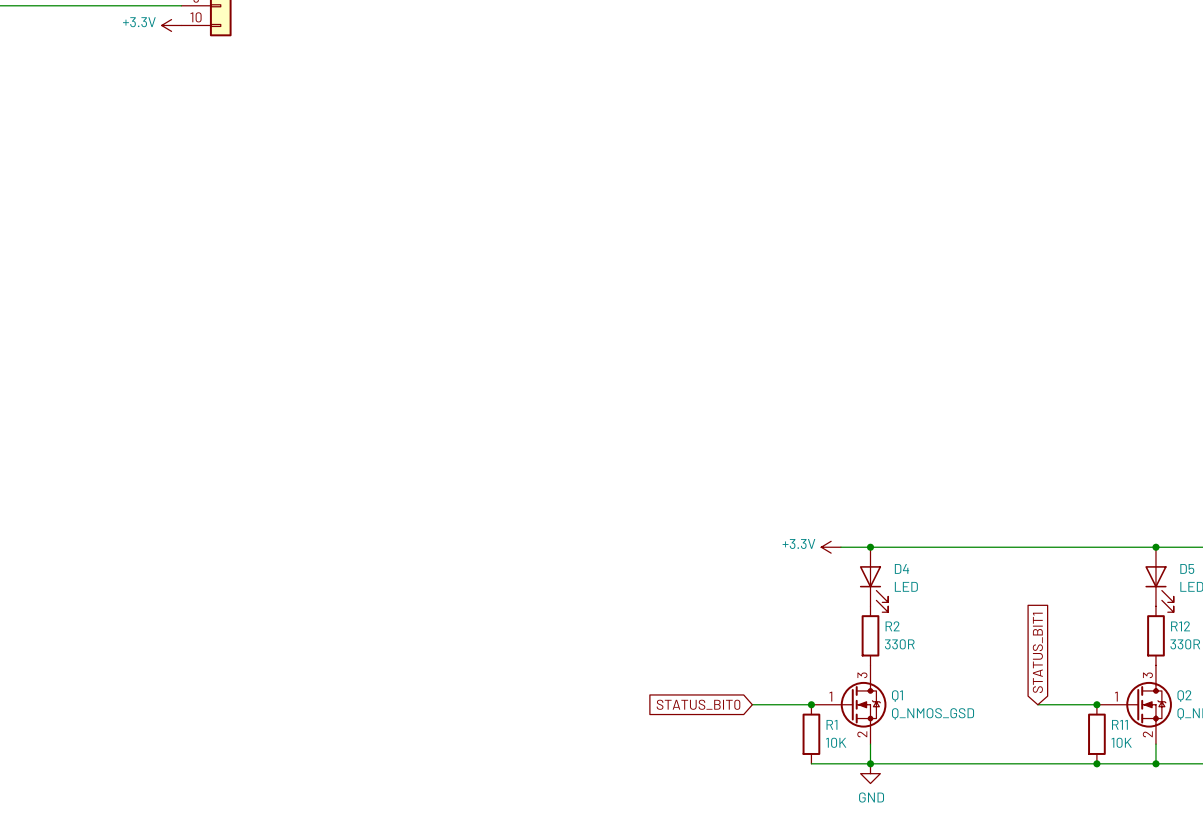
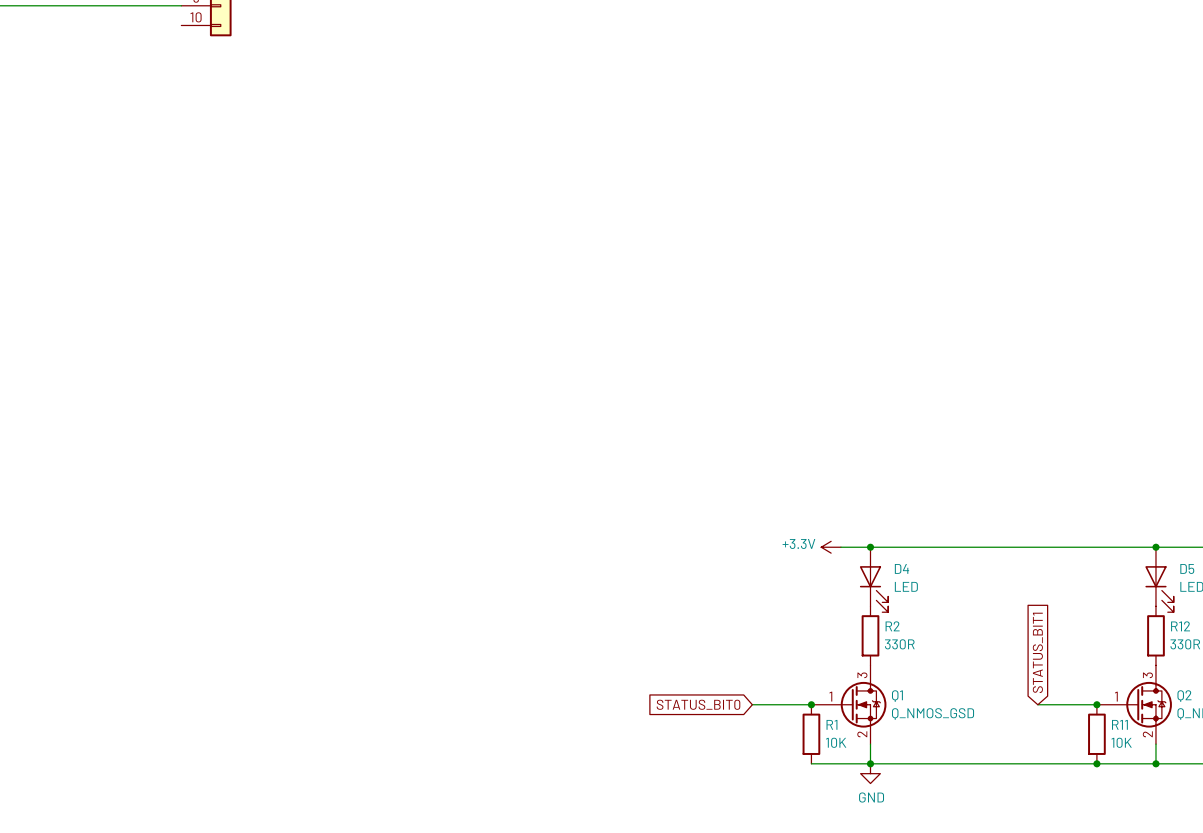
power symbol: +3.3V (171, 25) -> none

